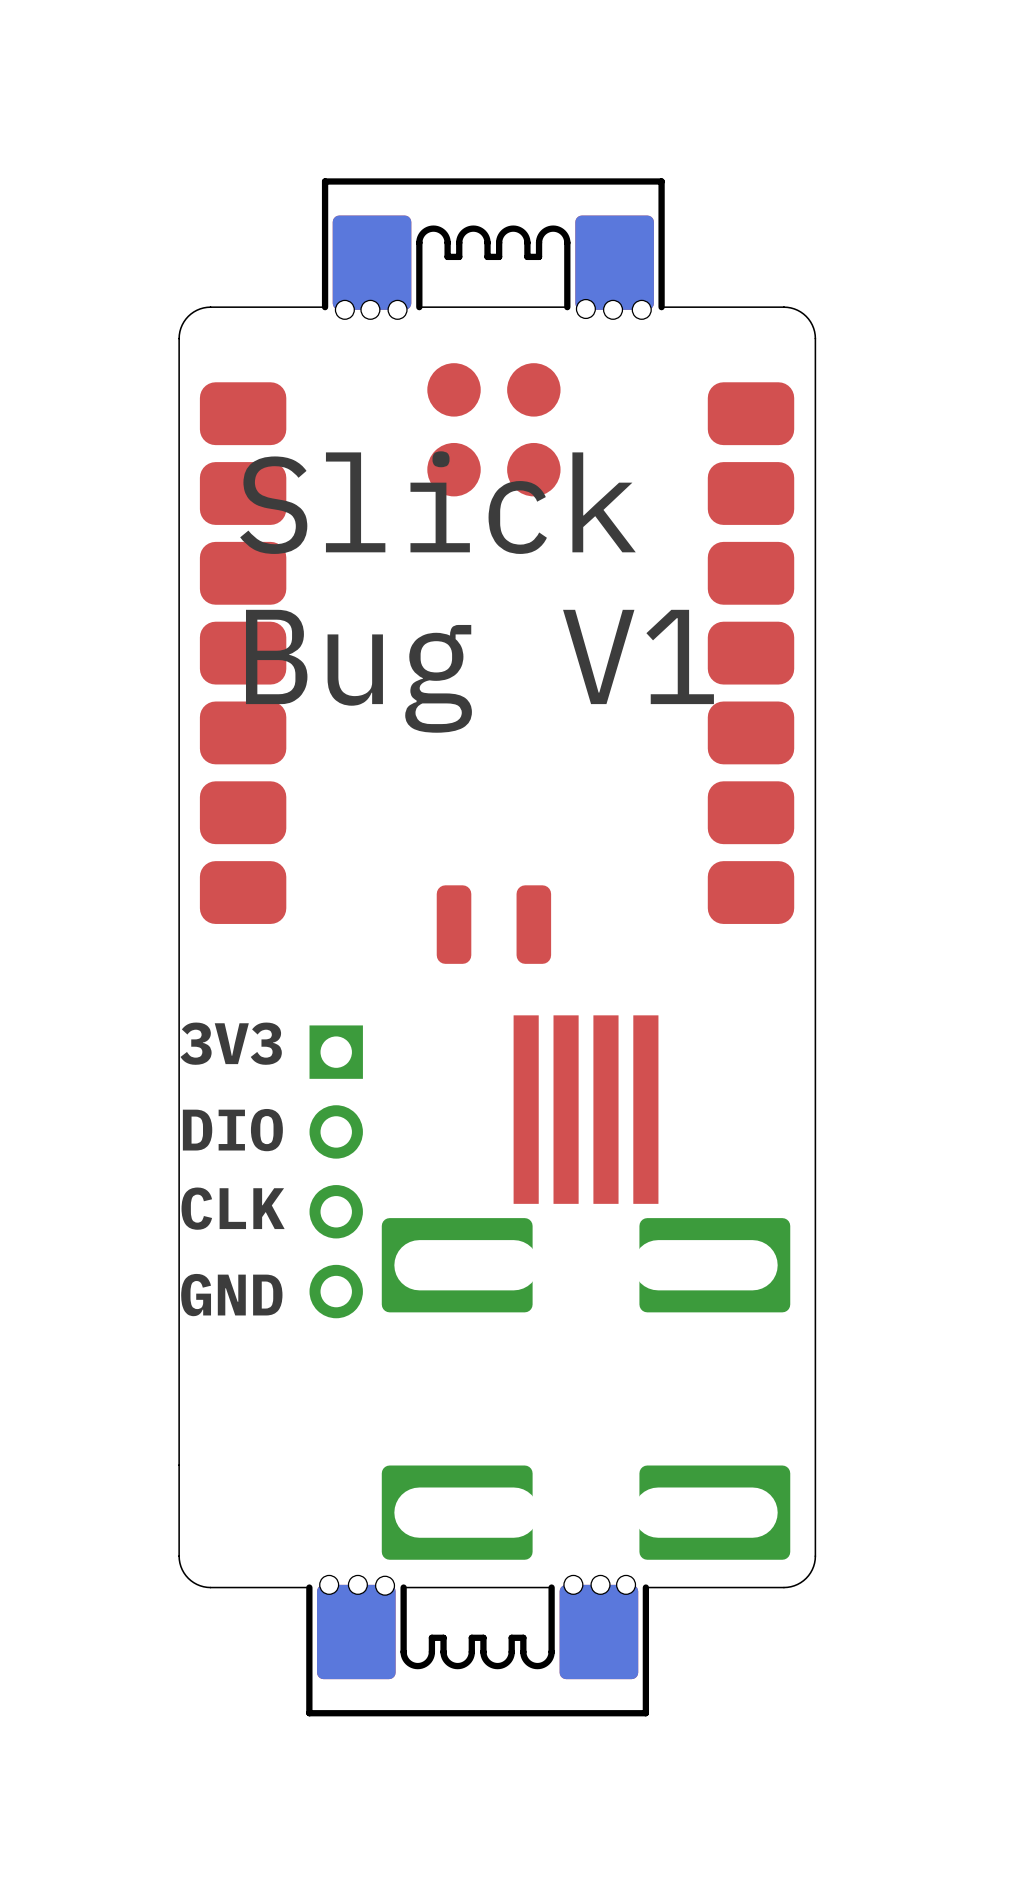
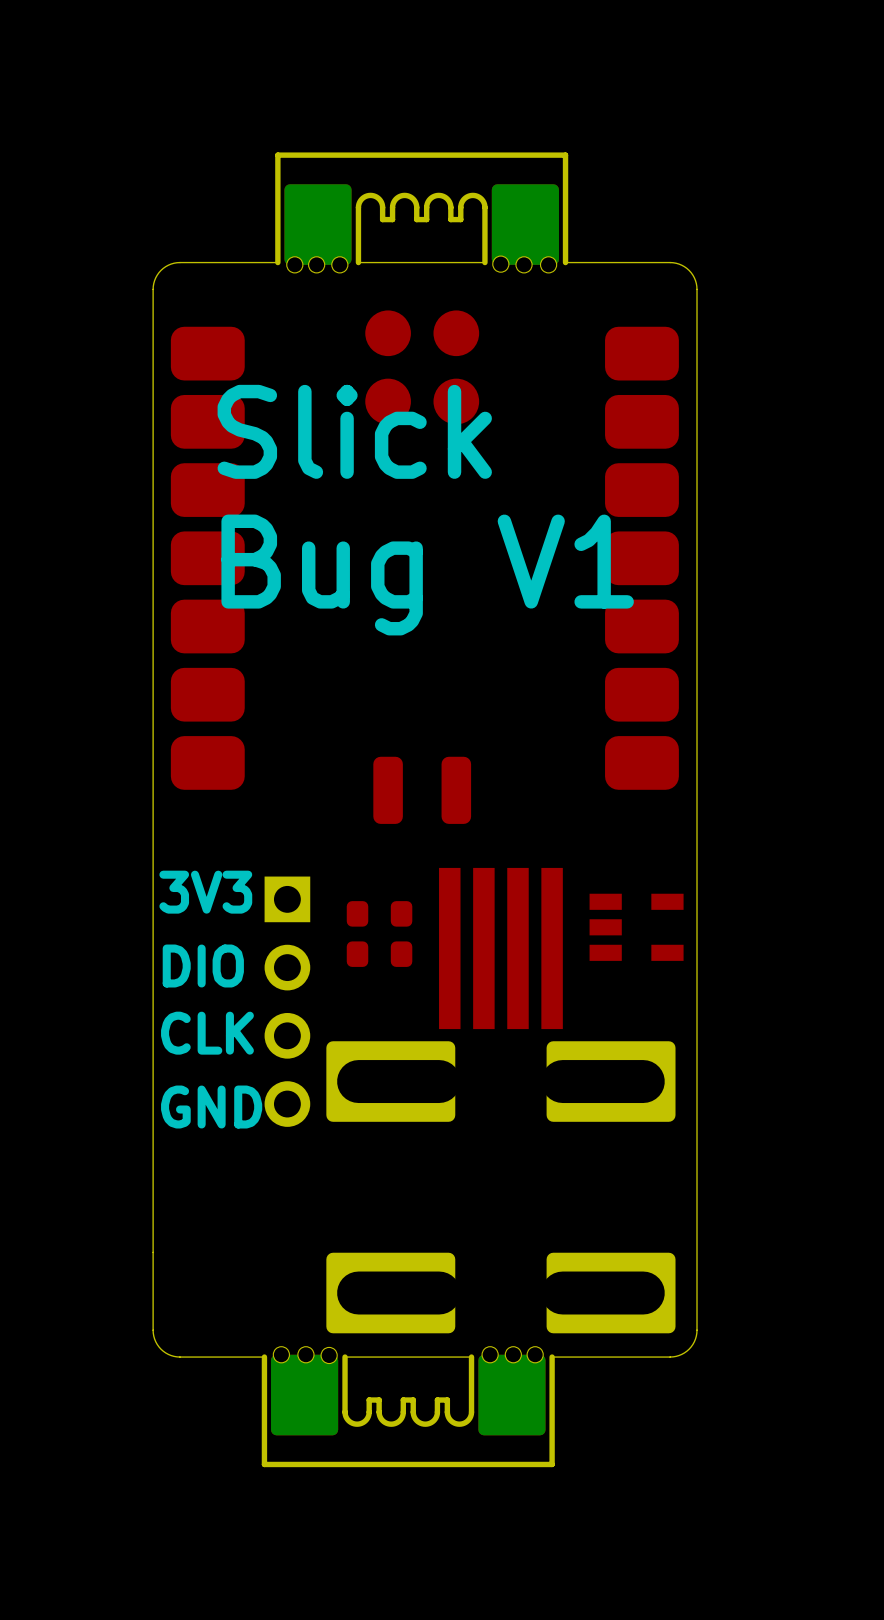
part: none -> (379, 913)
part: none -> (636, 927)
part: none -> (379, 954)

